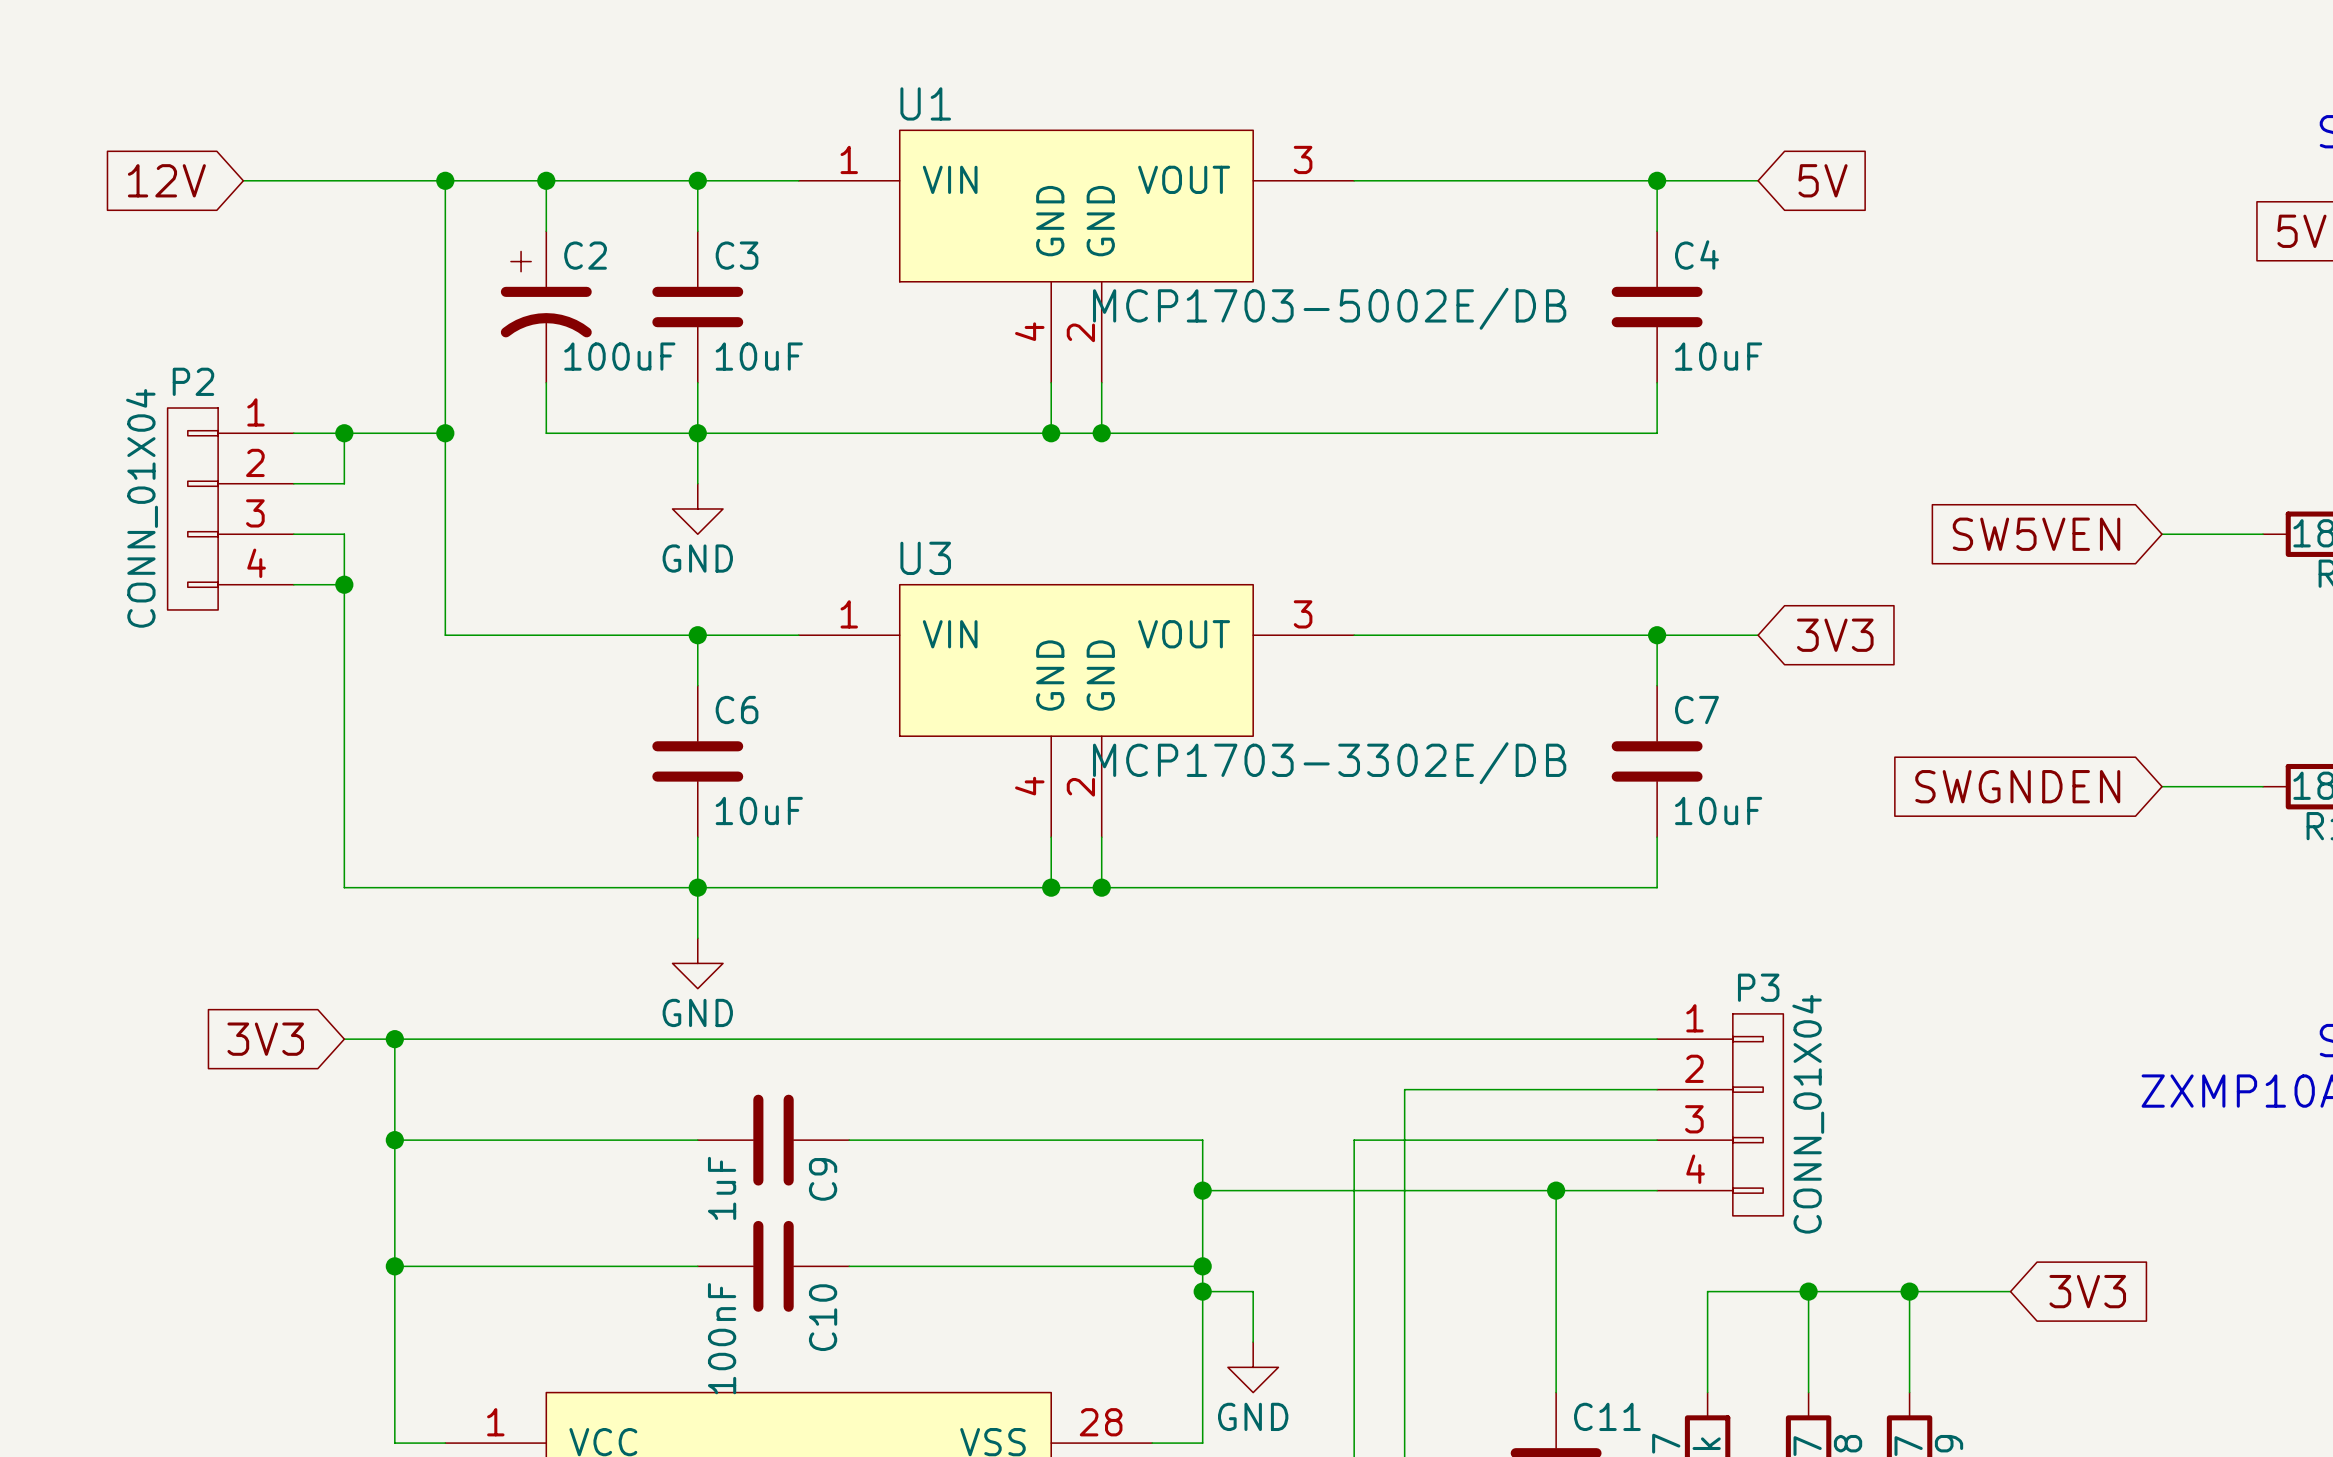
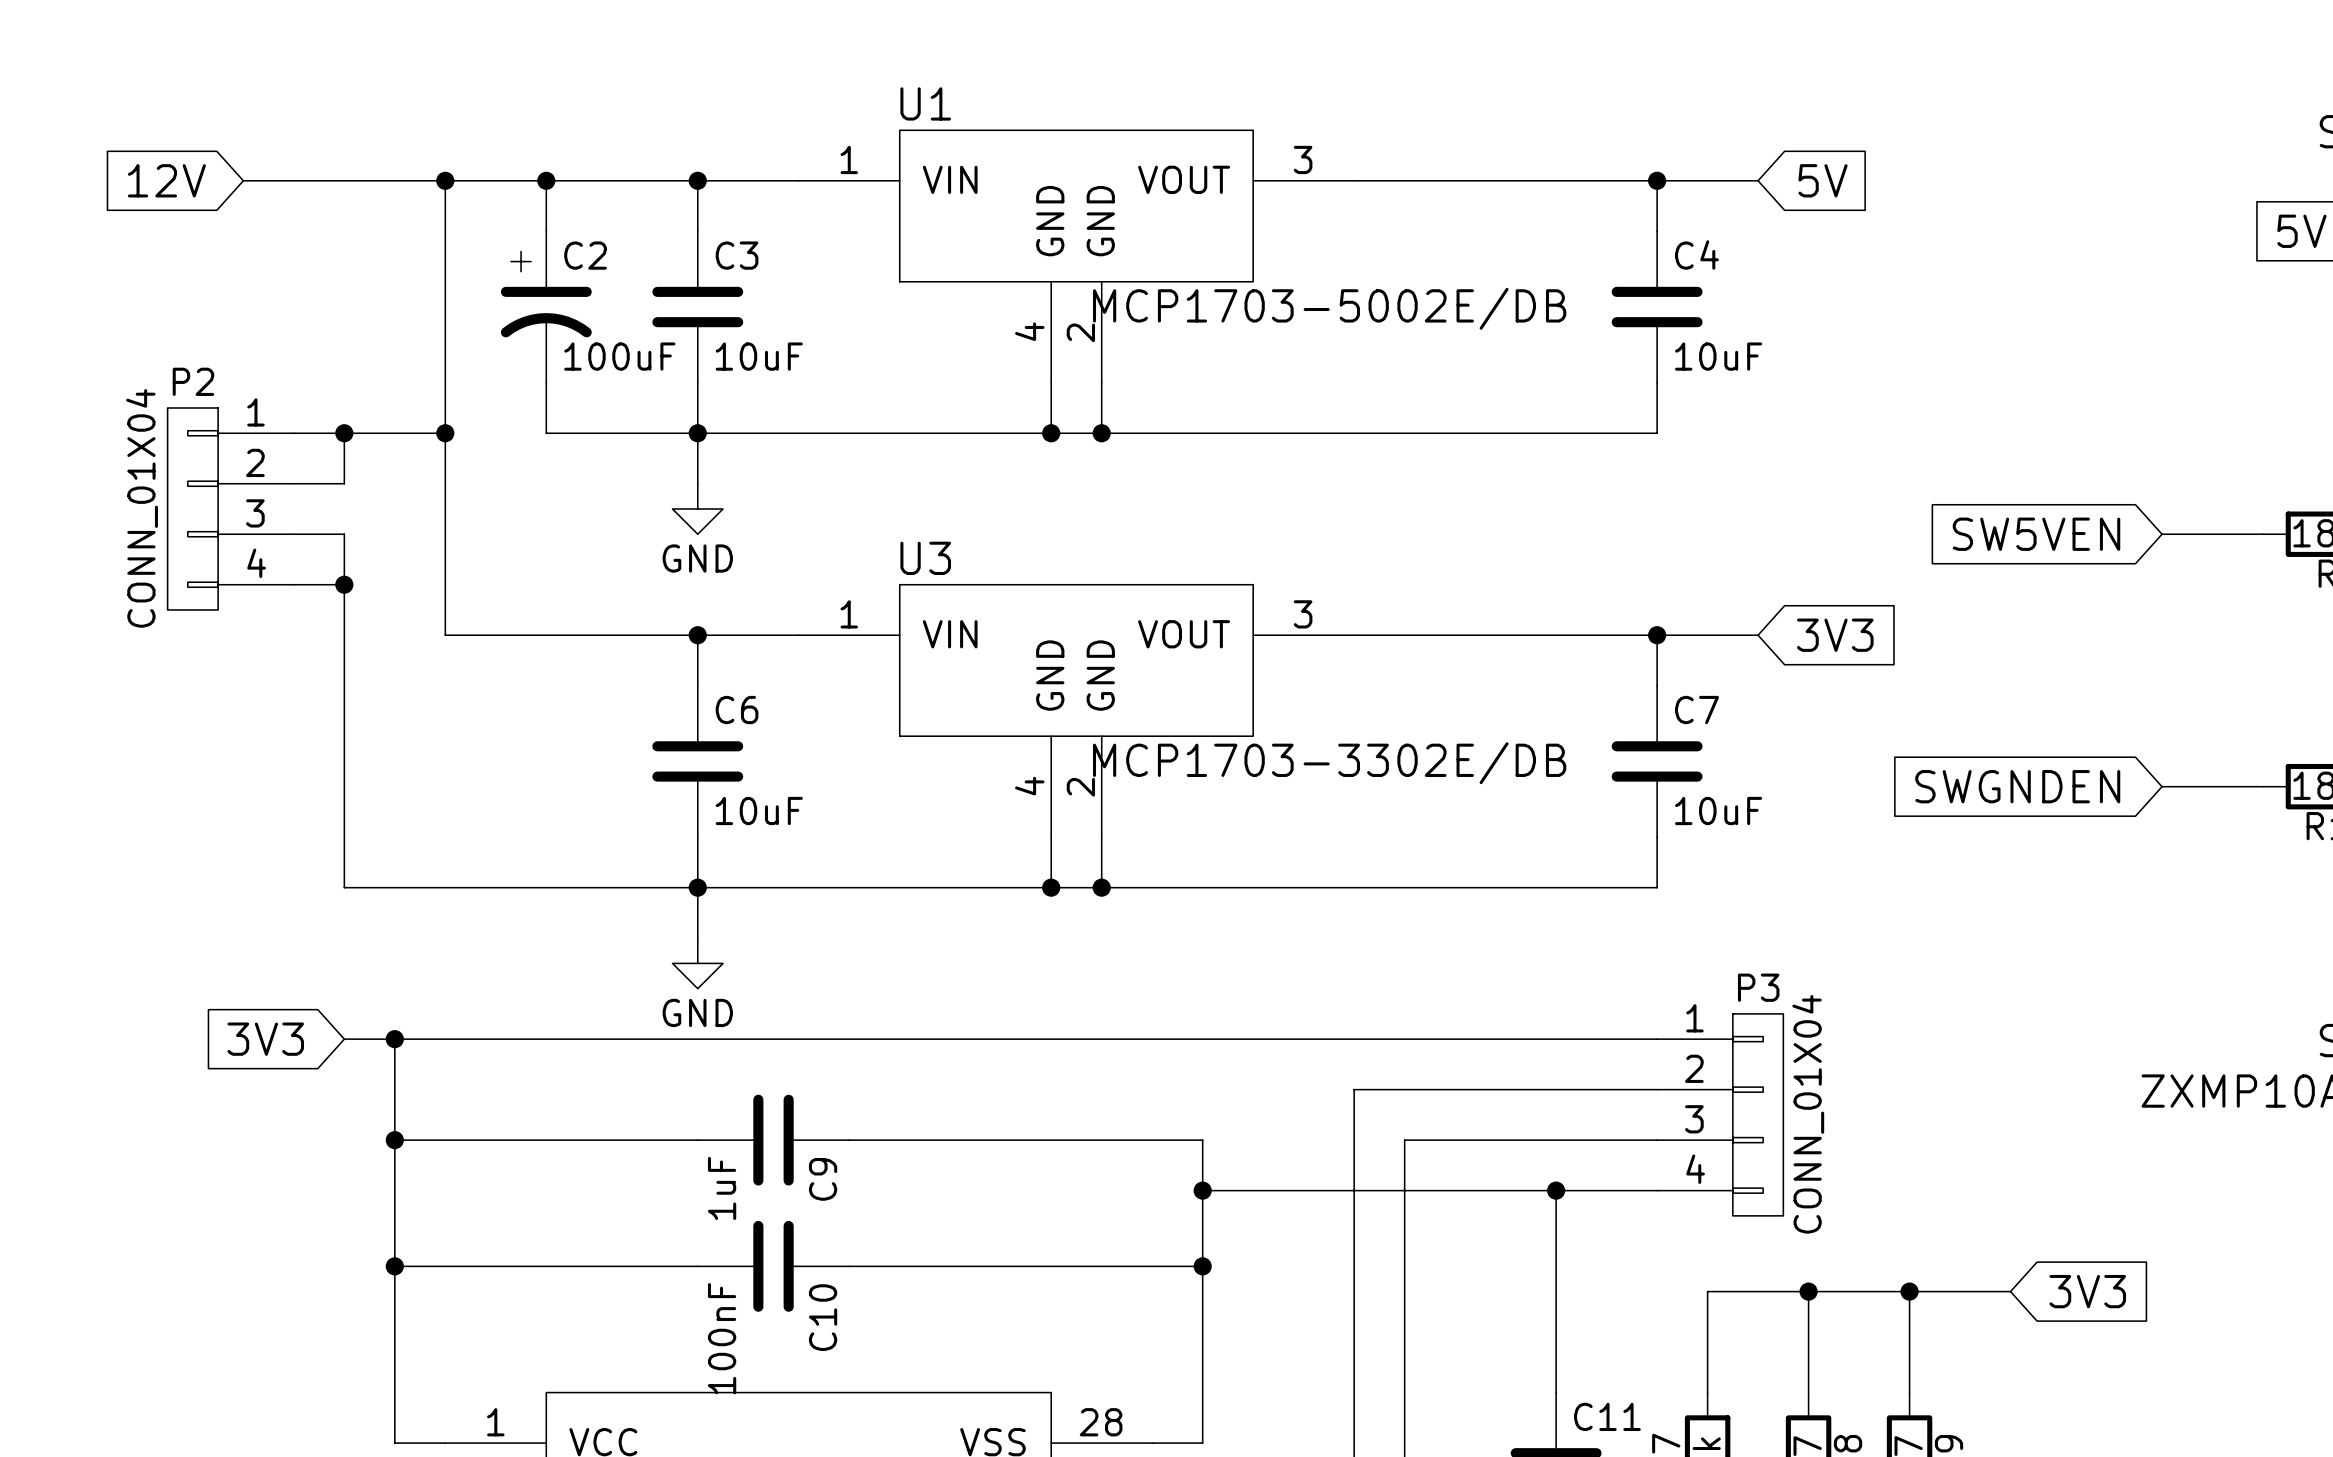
wire: (1404, 1089) (1404, 1140) (1354, 1140) -> (1404, 1089) (1354, 1089) (1354, 1140)
wire: (1202, 1291) (1253, 1291) (1253, 1342) -> none
junction: (1202, 1291) -> none
power symbol: GND (1253, 1367) -> none

